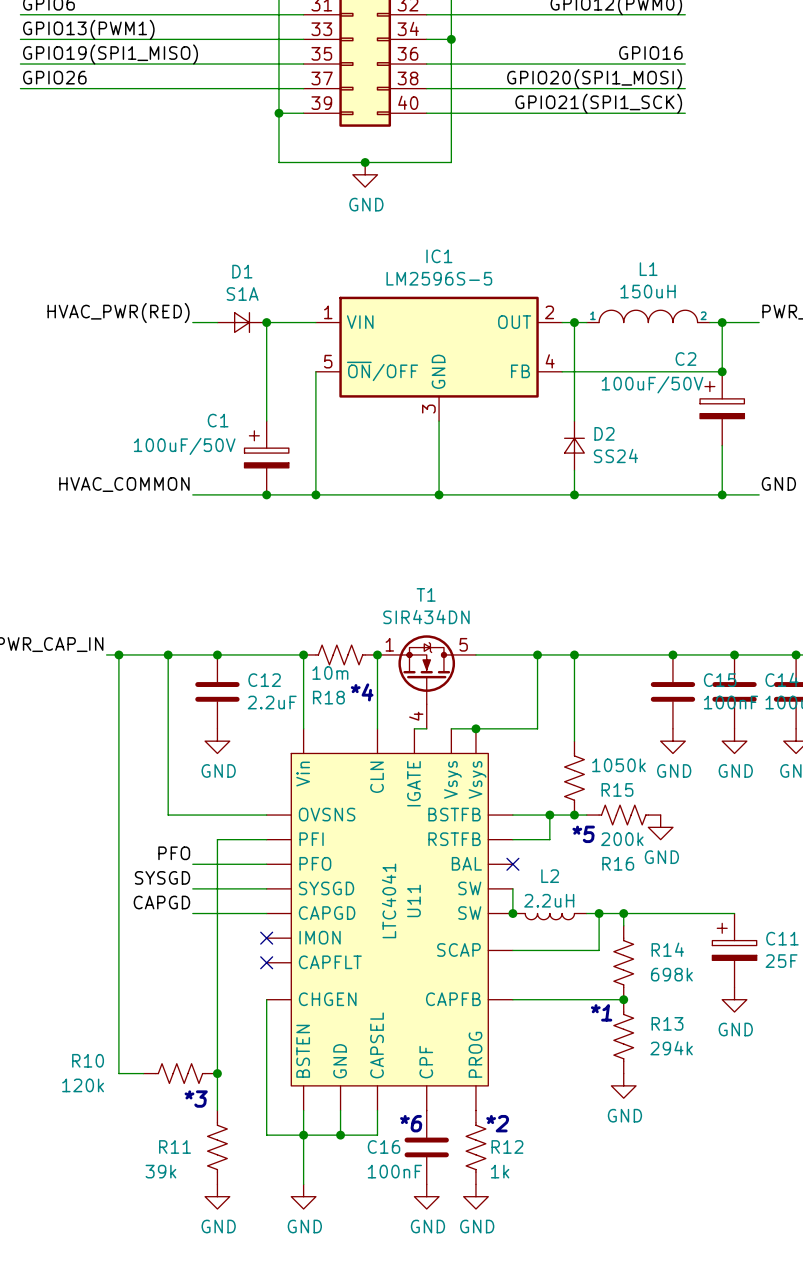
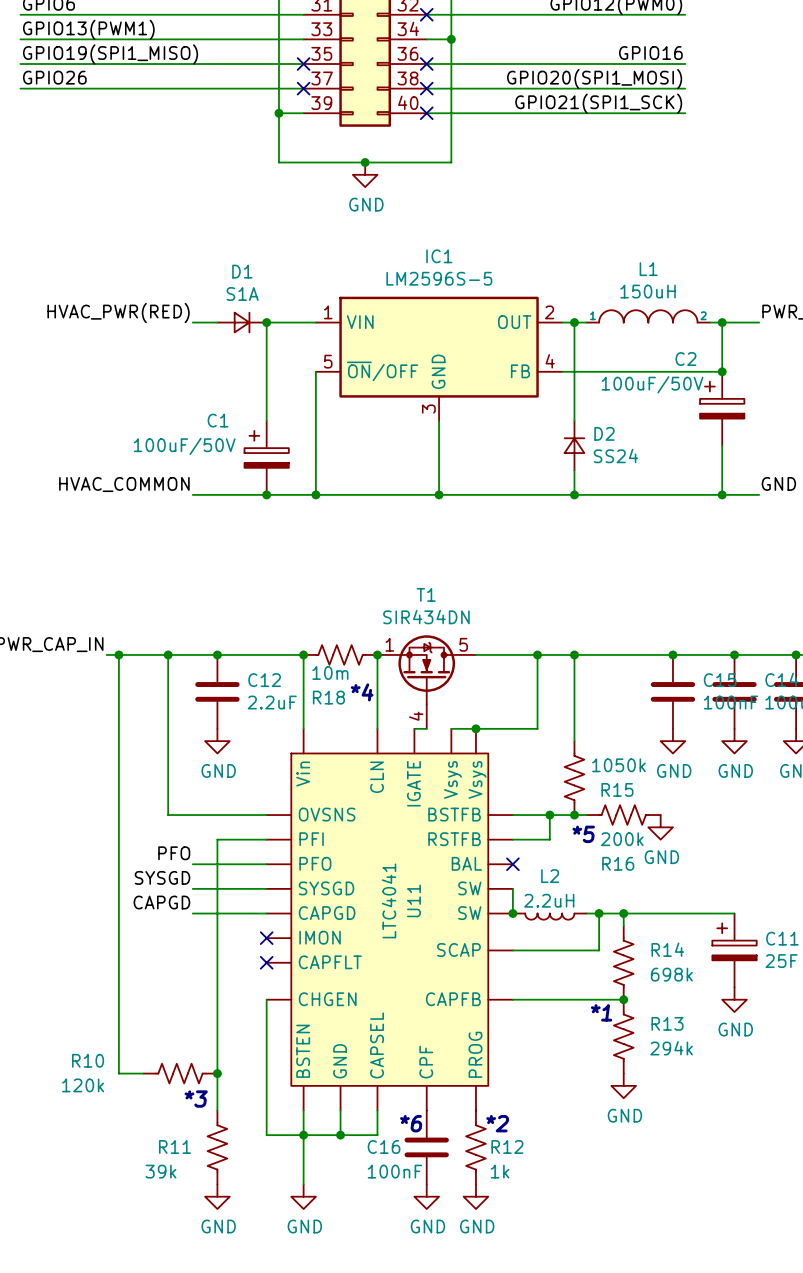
no-connect mark: none -> (426, 14)
no-connect mark: none -> (303, 64)
no-connect mark: none -> (426, 64)
no-connect mark: none -> (303, 88)
no-connect mark: none -> (426, 88)
no-connect mark: none -> (426, 113)

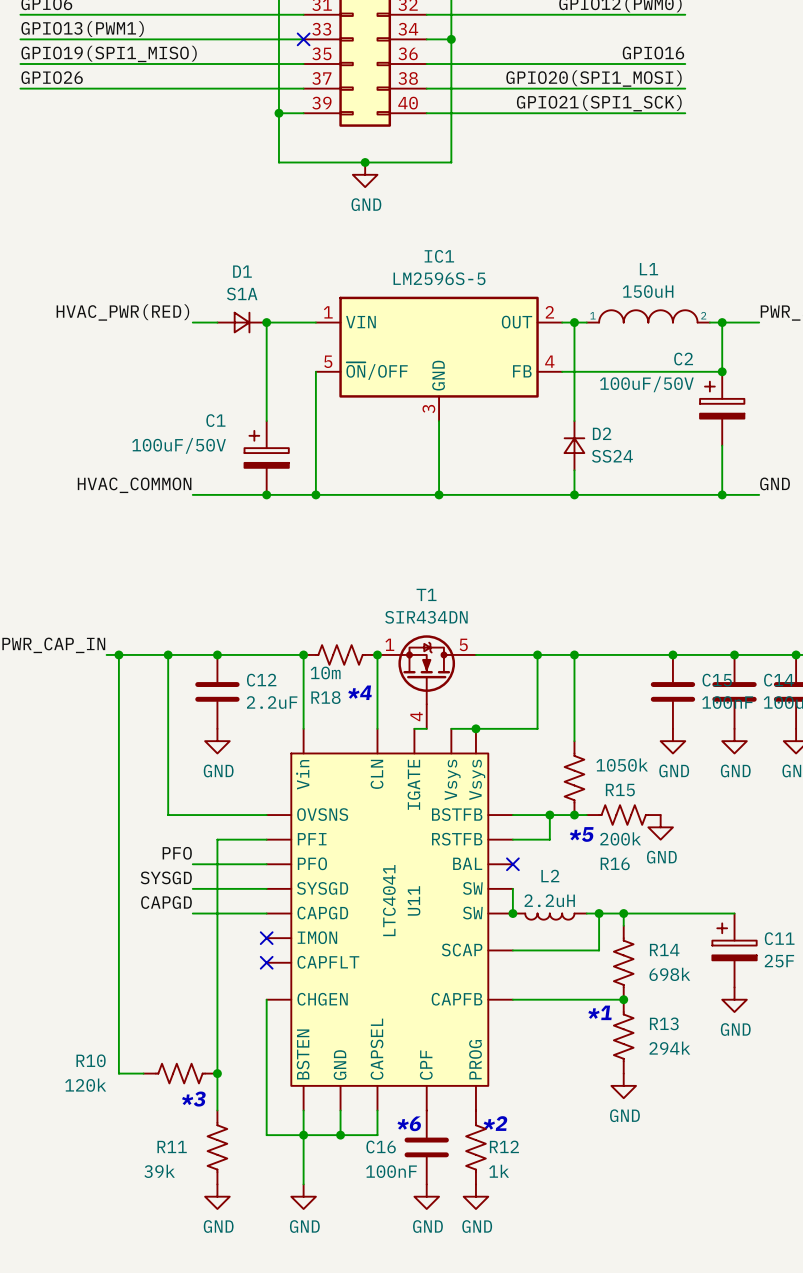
no-connect mark: (426, 14) -> none
no-connect mark: none -> (303, 39)
no-connect mark: (303, 64) -> none
no-connect mark: (426, 64) -> none
no-connect mark: (303, 88) -> none
no-connect mark: (426, 88) -> none
no-connect mark: (426, 113) -> none

